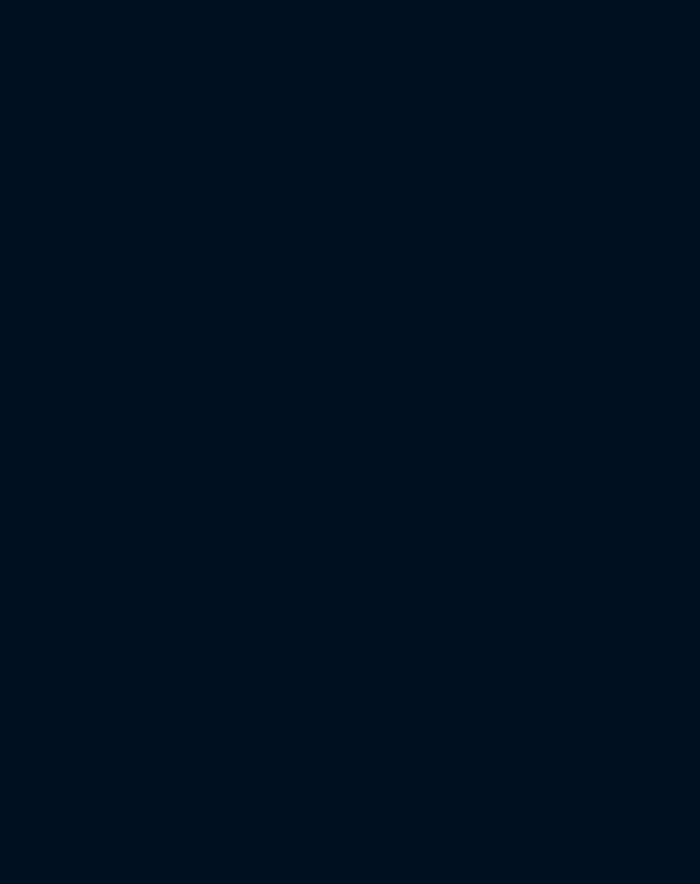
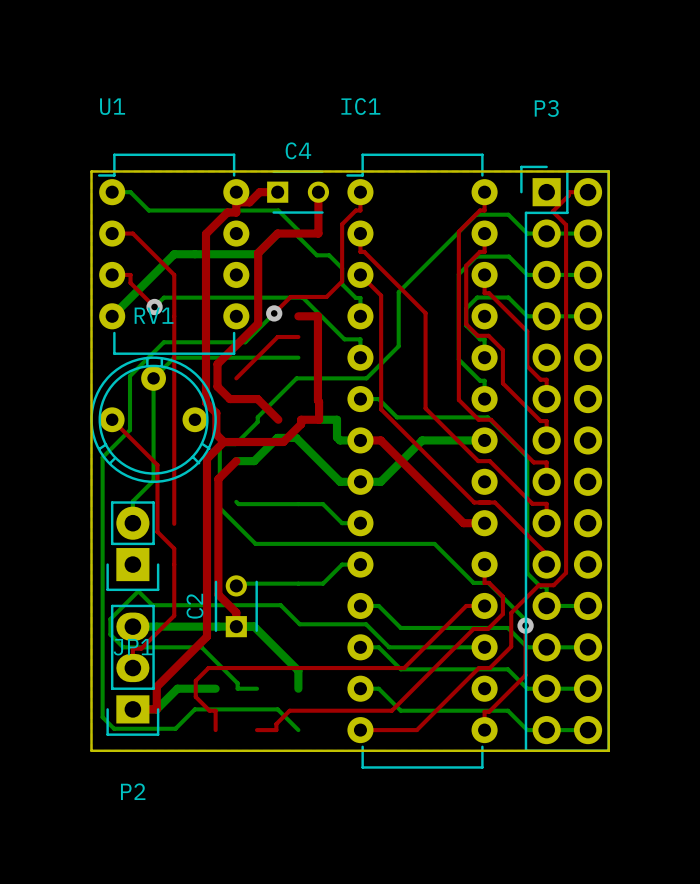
board edge: none -> (91, 171) (91, 750) (608, 750) (608, 171) (91, 171)
bottom track: none -> (112, 192) (130, 192) (148, 210) (278, 210) (297, 230) (297, 236) (316, 255) (329, 255) (342, 268) (342, 284) (355, 297) (360, 297) (360, 316)
top track: none -> (236, 192) (236, 212) (227, 212) (206, 233) (206, 402) (216, 413) (216, 434) (223, 442)
top track: none -> (277, 192) (259, 192) (249, 202) (236, 202)
C4: none -> (298, 192)
top track: none -> (318, 192) (318, 233) (277, 233) (258, 253) (258, 323) (217, 364) (217, 386) (229, 399) (257, 399) (278, 419)
top track: none -> (360, 192) (360, 210) (355, 210) (342, 224) (342, 281) (326, 296) (290, 296) (274, 313)
top track: none -> (484, 192) (484, 210) (480, 210) (458, 231) (458, 399) (478, 419) (491, 419) (533, 462) (546, 462) (546, 481)
top track: none -> (588, 192) (568, 192) (568, 195) (552, 211) (566, 224) (566, 572) (553, 585) (538, 585) (511, 612) (511, 646) (489, 668) (478, 668) (416, 730) (360, 730)
top track: none -> (112, 233) (132, 233) (174, 274) (174, 523)
bottom track: none -> (277, 233) (257, 254) (174, 254) (112, 316)
top track: none -> (360, 233) (360, 251) (364, 251) (425, 313) (425, 408) (478, 461) (489, 461) (532, 503) (546, 503) (546, 523)
top track: none -> (484, 233) (484, 251) (480, 251) (466, 265) (466, 324) (477, 335) (488, 335) (502, 350) (502, 383) (540, 421) (546, 421) (546, 440)
bottom track: none -> (588, 233) (527, 233) (508, 214) (476, 214) (398, 292) (398, 346) (366, 378) (296, 378) (257, 417) (257, 421) (235, 444) (223, 444) (219, 448) (219, 508) (255, 543) (434, 543) (473, 582) (488, 582) (525, 620) (525, 625)
U1: none -> (173, 254)
top track: none -> (112, 274) (130, 274) (130, 282) (154, 307)
top track: none -> (360, 274) (381, 295) (381, 409) (474, 502) (494, 502) (546, 554) (546, 564)
top track: none -> (484, 274) (484, 293) (489, 293) (527, 331) (527, 366) (540, 379) (546, 379) (546, 399)
bottom track: none -> (588, 274) (527, 274) (508, 256) (476, 256) (458, 274) (458, 359) (480, 380) (484, 380) (484, 399)
bottom track: none -> (154, 307) (163, 297) (302, 297) (344, 339) (360, 339) (360, 357)
via: none -> (154, 307)
bottom track: none -> (274, 313) (245, 342) (163, 342) (130, 376) (130, 430) (102, 457) (102, 717) (114, 728) (175, 728) (194, 709) (277, 709) (298, 730)
via: none -> (274, 313)
top track: none -> (298, 316) (317, 316) (319, 419) (301, 419) (301, 424) (283, 442) (223, 442)
bottom track: none -> (588, 316) (527, 316) (508, 297) (477, 297) (466, 308) (466, 325) (480, 339) (484, 339) (484, 357)
top track: none -> (298, 337) (277, 337) (236, 378)
bottom track: none -> (298, 357) (174, 357) (153, 378) (153, 480) (132, 501) (132, 523)
bottom track: none -> (360, 399) (378, 399) (397, 417) (487, 417) (527, 456) (527, 573) (540, 586) (546, 586) (546, 605) (588, 605)
top track: none -> (112, 419) (157, 465) (157, 531) (174, 548) (174, 615) (141, 648) (132, 648) (132, 668)
RV1: none -> (153, 419)
bottom track: none -> (319, 419) (337, 419) (337, 437) (340, 440) (360, 440)
top track: none -> (360, 440) (380, 440) (463, 523) (484, 523)
bottom track: none -> (484, 440) (422, 440) (380, 481) (340, 481) (296, 437) (277, 437) (254, 461) (236, 461)
top track: none -> (223, 442) (206, 458) (206, 636) (156, 686) (156, 709) (132, 709)
P3: none -> (565, 458)
top track: none -> (236, 461) (218, 479) (218, 594) (236, 612) (236, 626)
IC1: none -> (421, 461)
bottom track: none -> (236, 501) (238, 504) (323, 504) (342, 523) (360, 523)
JP1: none -> (132, 546)
bottom track: none -> (360, 564) (342, 564) (323, 583) (238, 583) (236, 585)
top track: none -> (484, 564) (484, 582) (489, 582) (502, 596) (502, 614) (488, 629) (473, 629) (391, 710) (289, 710) (276, 724) (276, 730) (257, 730)
bottom track: none -> (360, 605) (378, 605) (400, 627) (507, 627) (527, 647) (588, 647)
top track: none -> (484, 605) (466, 605) (404, 668) (208, 668) (195, 680) (195, 696) (209, 710) (215, 710) (215, 730)
C2: none -> (236, 606)
top track: none -> (525, 625) (525, 675) (489, 711) (484, 711) (484, 730)
via: none -> (525, 625)
bottom track: none -> (132, 626) (254, 626) (298, 670) (298, 688)
bottom track: none -> (360, 647) (378, 647) (400, 669) (507, 669) (527, 688) (588, 688)
bottom track: none -> (484, 647) (389, 647) (366, 624) (299, 624) (280, 605) (152, 605) (138, 591) (110, 619) (110, 634) (123, 647) (201, 647) (237, 683) (237, 688) (257, 688)
P2: none -> (132, 670)
bottom track: none -> (215, 688) (177, 688) (156, 709) (132, 709)
bottom track: none -> (360, 688) (378, 688) (400, 710) (507, 710) (527, 730) (588, 730)

